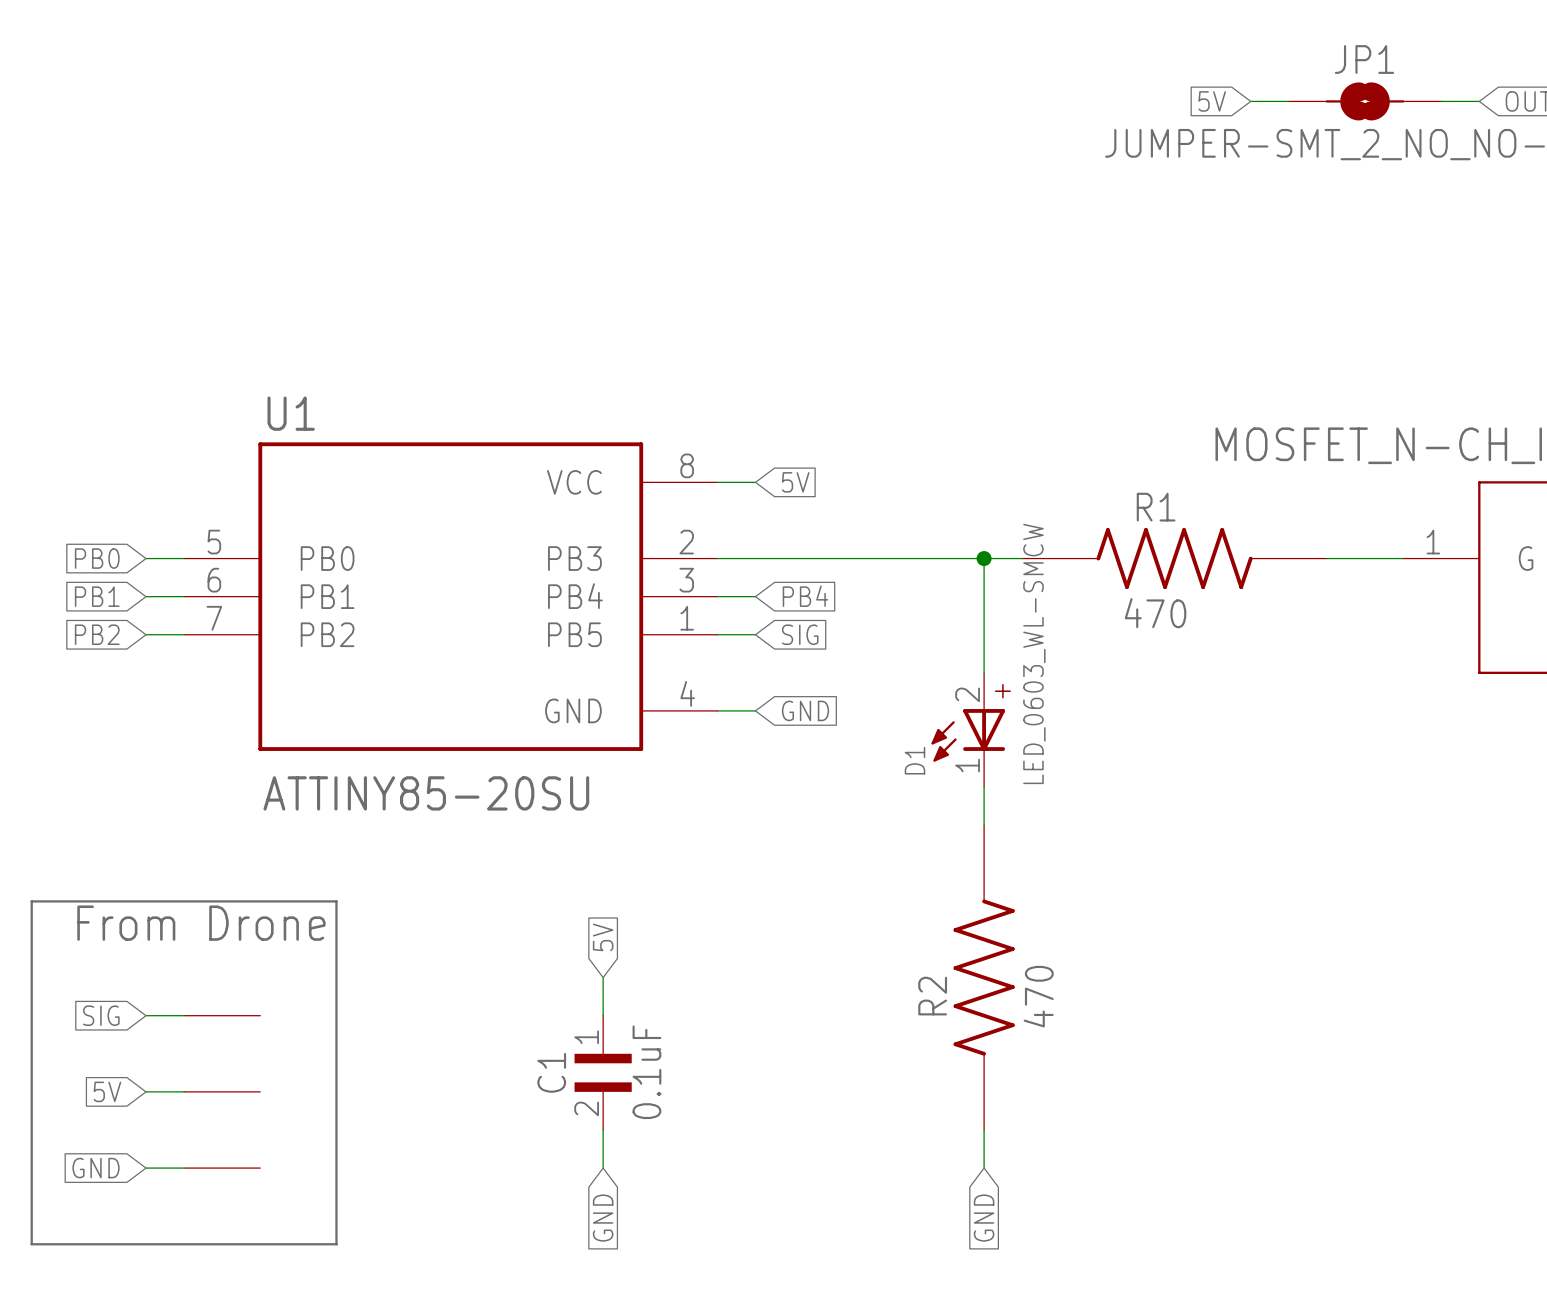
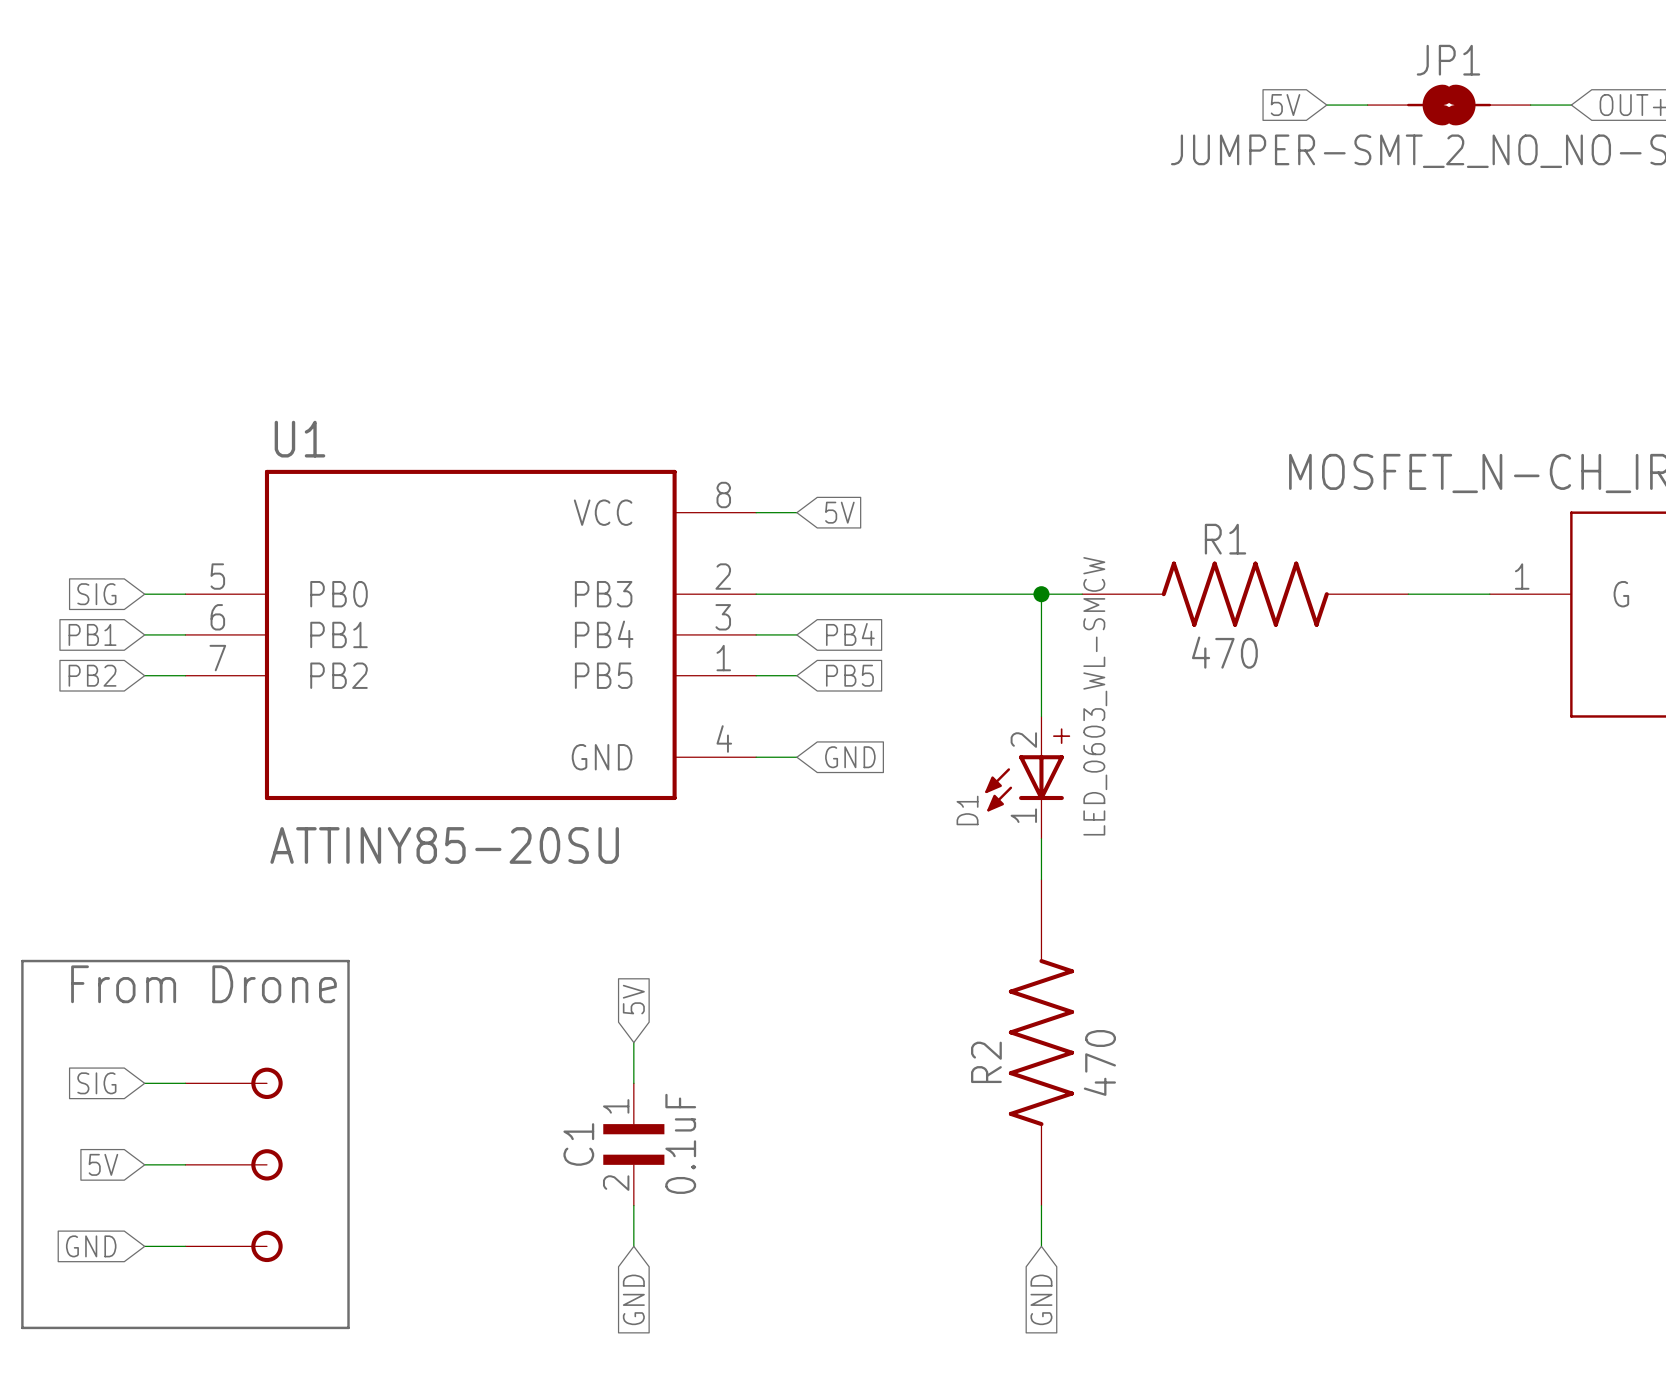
global label: PB0 (97, 558) -> SIG (96, 594)
global label: SIG (800, 634) -> PB5 (849, 675)
part symbol: [184, 1015, 261, 1016] -> [185, 1067, 283, 1100]
part symbol: [184, 1091, 261, 1092] -> [185, 1149, 283, 1181]
part symbol: [184, 1168, 261, 1169] -> [185, 1230, 283, 1263]

